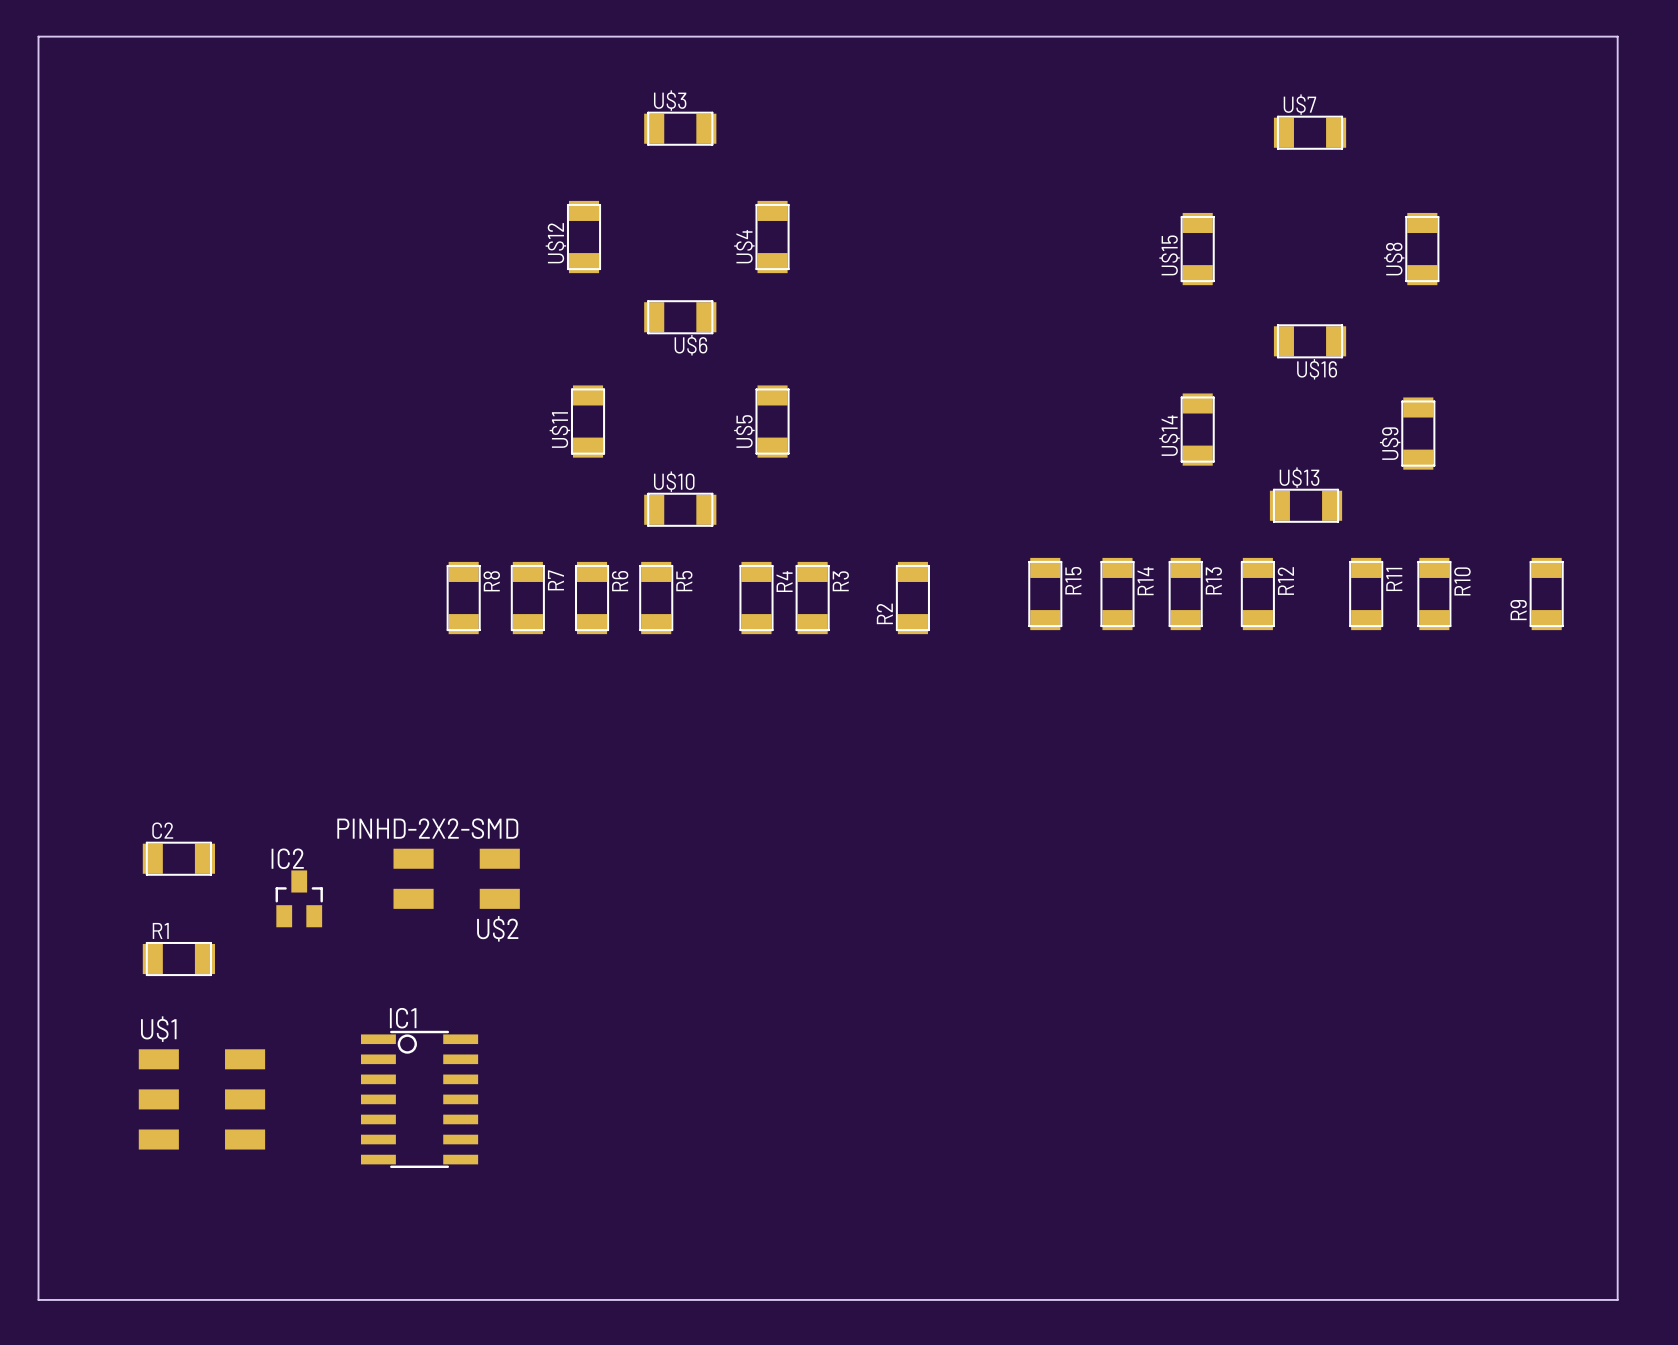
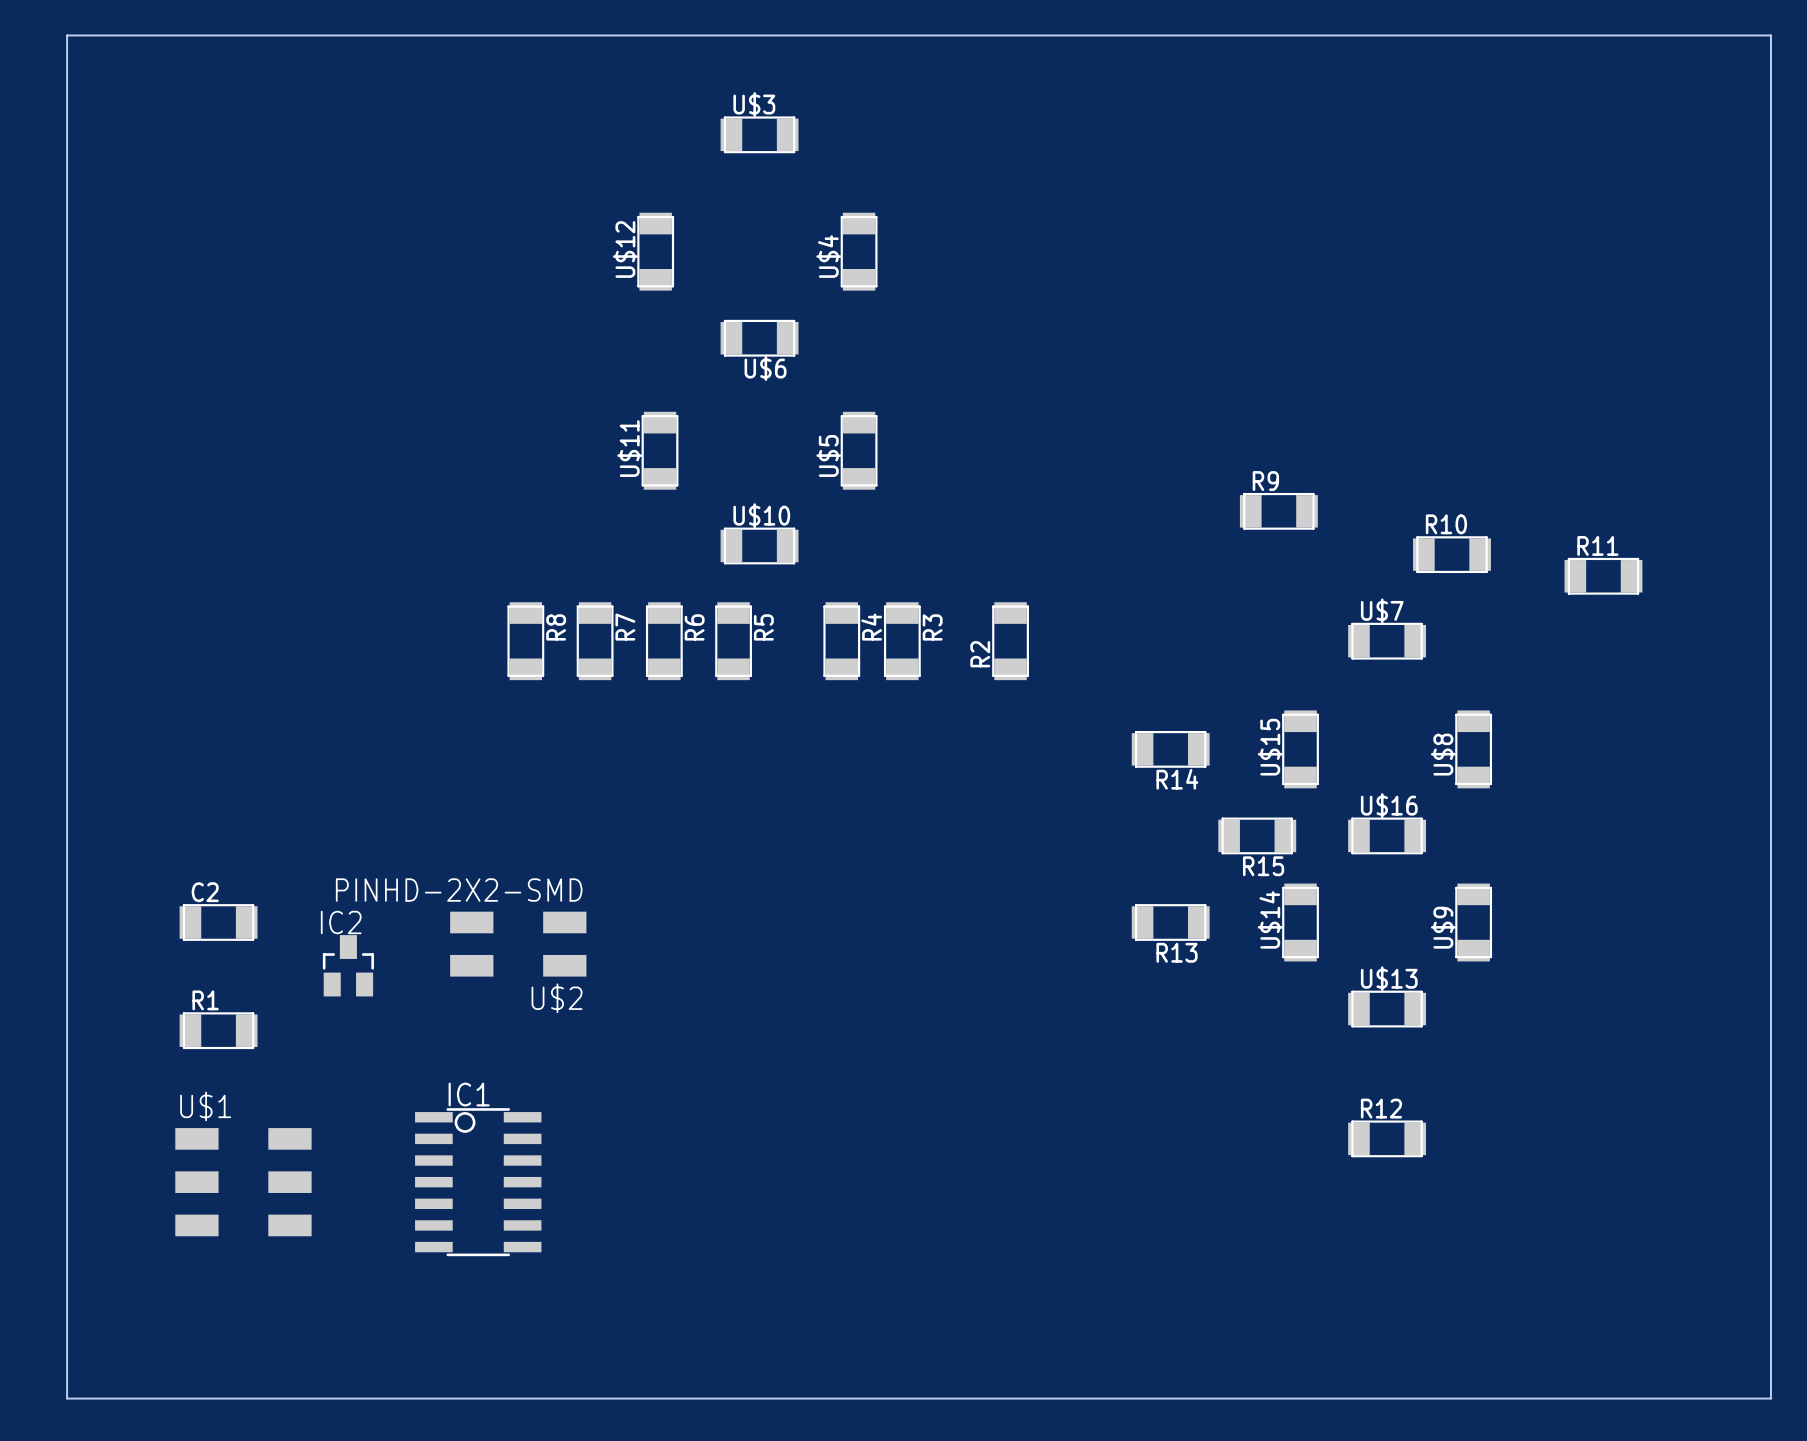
U$7 position: (1310, 132) -> (1387, 641)
U$15 position: (1197, 249) -> (1300, 749)
U$8 position: (1422, 249) -> (1473, 749)
U$16 position: (1310, 341) -> (1387, 835)
U$16 name position: U$16 (1317, 369) -> U$16 (1389, 805)
U$14 position: (1197, 429) -> (1300, 922)
U$9 position: (1418, 433) -> (1473, 922)
U$13 position: (1306, 505) -> (1387, 1009)
R11 name position: R11 (1394, 579) -> R11 (1597, 545)
R12 name position: R12 (1285, 581) -> R12 (1381, 1108)
R10 name position: R10 (1462, 581) -> R10 (1446, 524)
R15 rotation: 0° (1045, 594) -> 90° clockwise (1257, 835)
R15 position: (1045, 594) -> (1257, 835)
R14 rotation: 0° (1117, 594) -> 90° clockwise (1170, 749)
R14 position: (1117, 594) -> (1170, 749)
R13 rotation: 0° (1185, 594) -> 90° clockwise (1170, 922)
R13 position: (1185, 594) -> (1170, 922)
R12 rotation: 0° (1257, 594) -> 90° clockwise (1387, 1138)
R12 position: (1257, 594) -> (1387, 1138)
R11 rotation: 0° (1366, 594) -> 90° clockwise (1603, 576)
R11 position: (1366, 594) -> (1603, 576)
R10 rotation: 0° (1434, 594) -> 90° clockwise (1452, 554)
R10 position: (1434, 594) -> (1452, 554)
R9 rotation: 0° (1546, 594) -> 90° clockwise (1278, 511)
R9 position: (1546, 594) -> (1278, 511)

